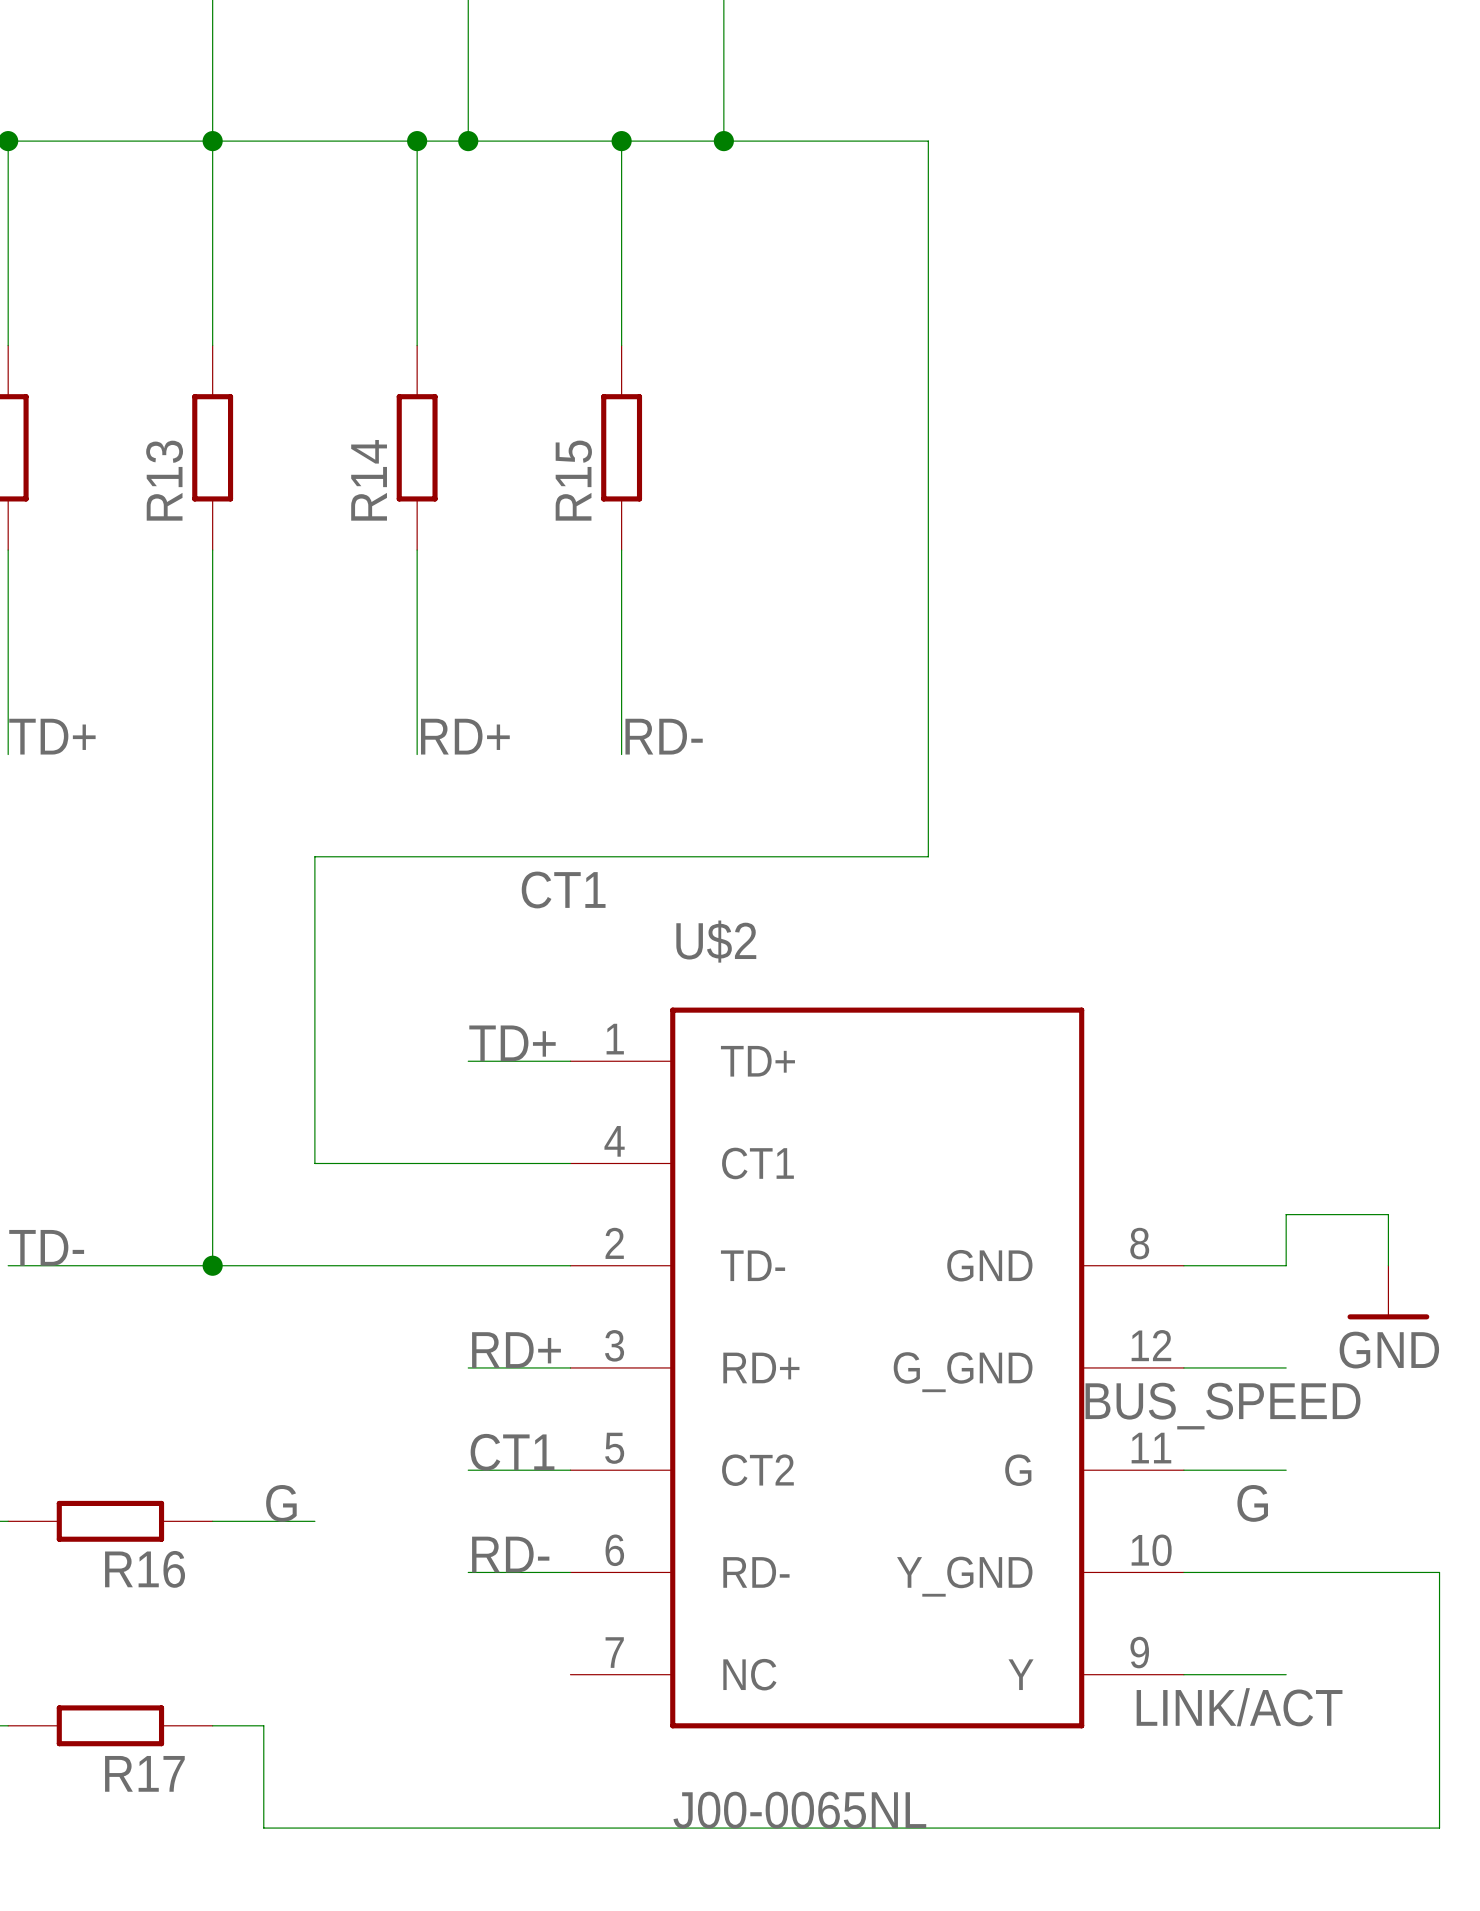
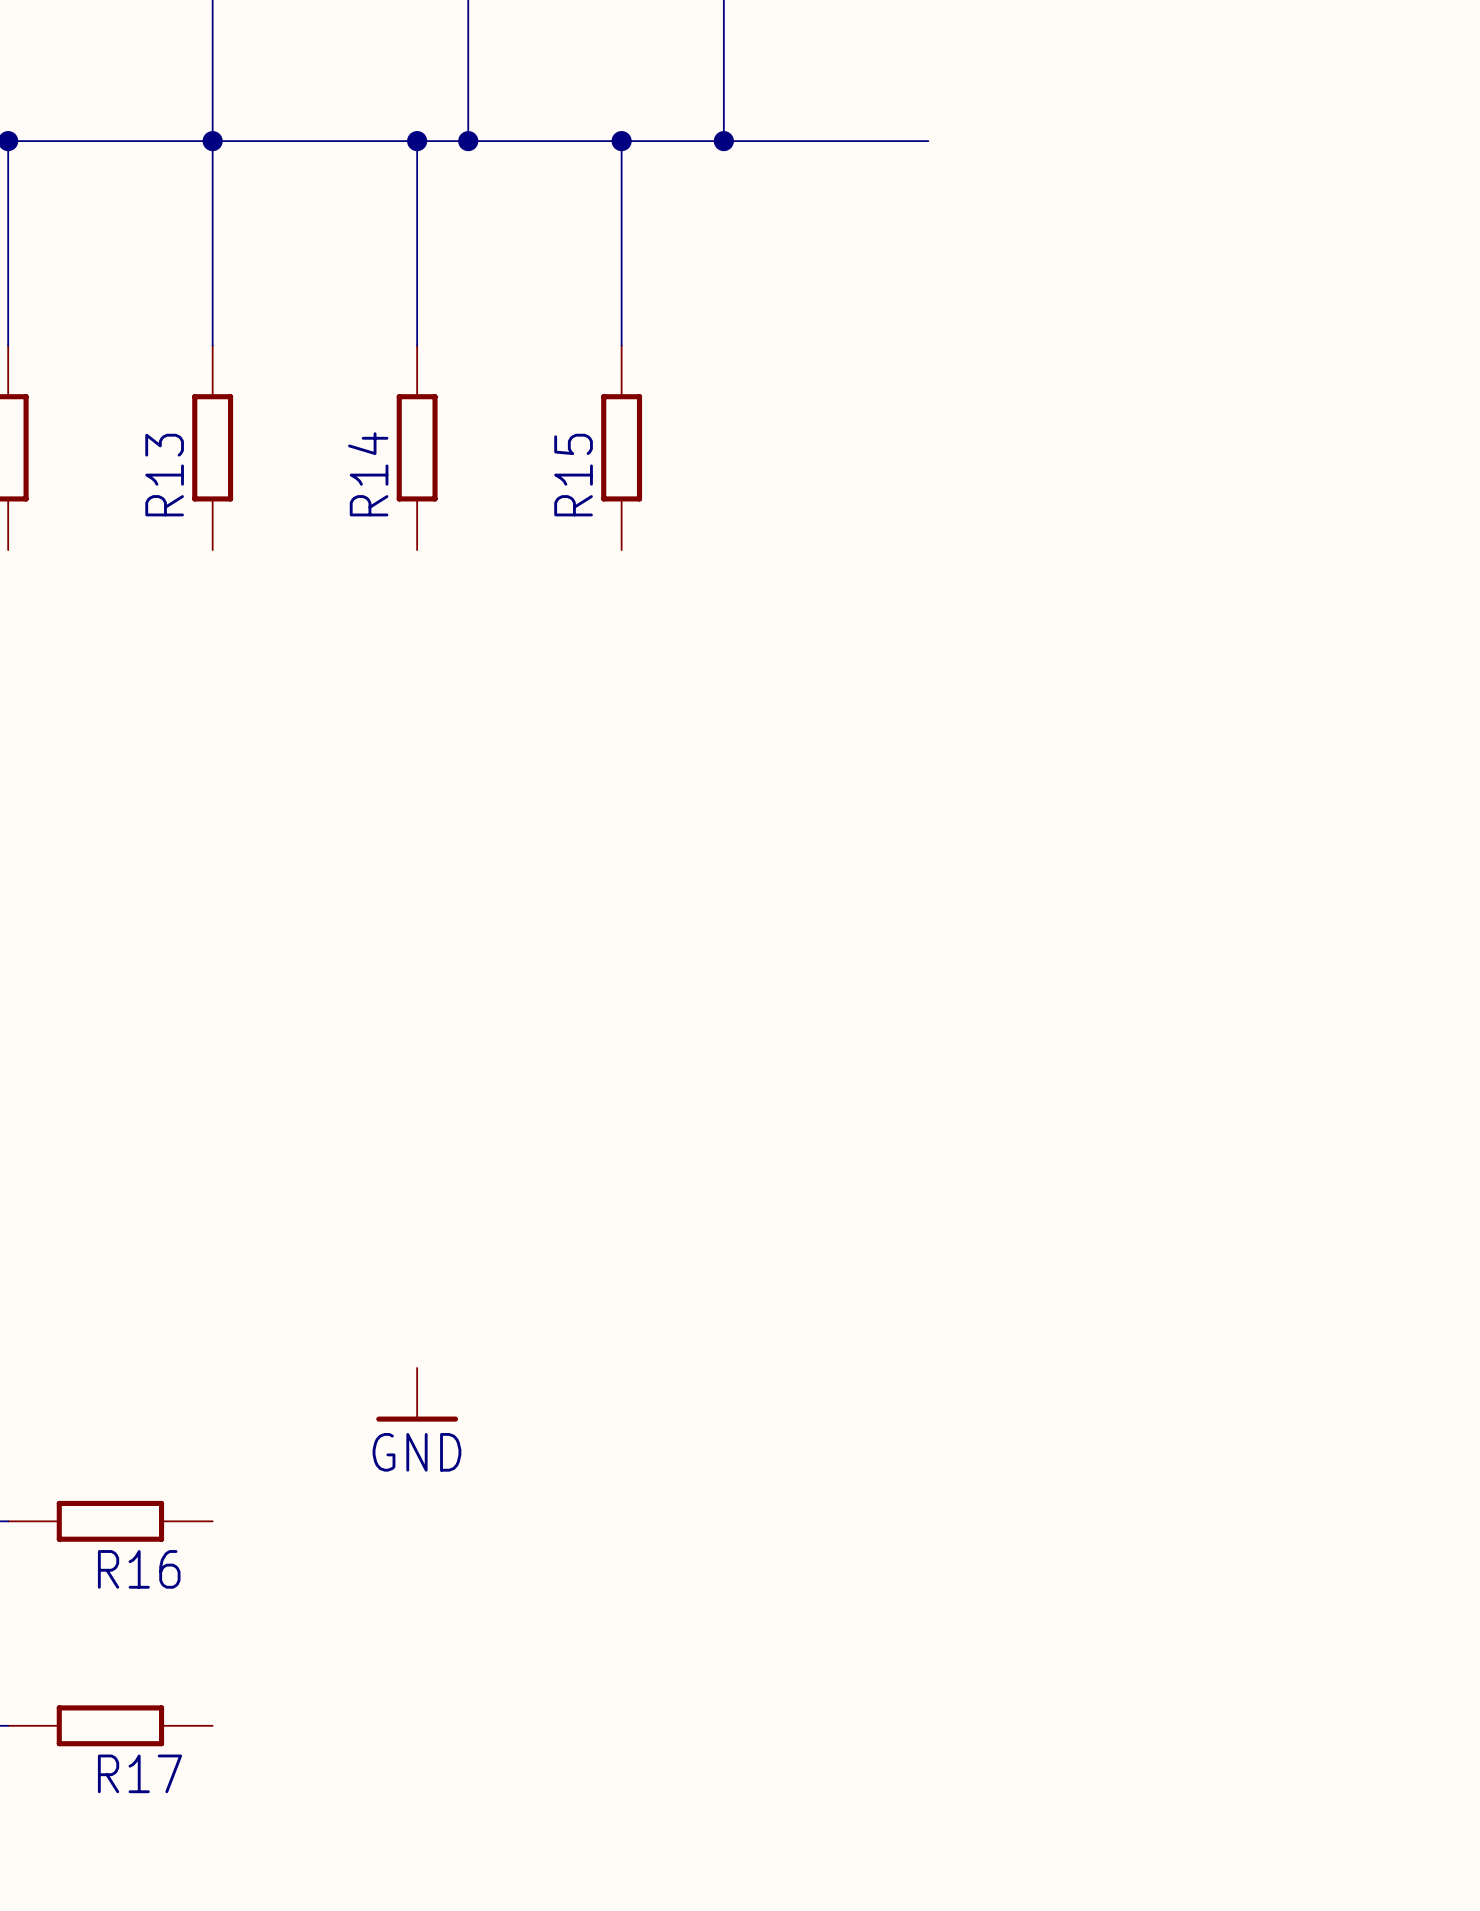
wire: (928, 141) (928, 856) (314, 856) (314, 1163) (570, 1163) -> none
wire: (8, 550) (8, 754) -> none
wire: (212, 550) (212, 1265) -> none
wire: (417, 550) (417, 754) -> none
wire: (621, 550) (621, 754) -> none
label: TD+ (52, 736) -> none
label: RD+ (465, 736) -> none
label: RD- (664, 736) -> none
label: CT1 (563, 889) -> none
label: TD+ (512, 1043) -> none
wire: (468, 1061) (570, 1061) -> none
label: TD- (46, 1247) -> none
wire: (8, 1265) (570, 1265) -> none
junction: (212, 1265) -> none
wire: (1183, 1265) (1286, 1265) (1286, 1214) (1388, 1214) (1388, 1265) -> none
power symbol: GND (1388, 1292) -> none
label: RD+ (516, 1350) -> none
wire: (468, 1367) (570, 1367) -> none
U$2: J00-0065NL (877, 1367) -> none
wire: (1183, 1367) (1286, 1367) -> none
power symbol: none -> GND (417, 1394)
label: BUS_SPEED (1222, 1406) -> none
label: CT1 (512, 1452) -> none
wire: (468, 1470) (570, 1470) -> none
wire: (1183, 1470) (1286, 1470) -> none
label: G (281, 1503) -> none
label: G (1252, 1503) -> none
wire: (212, 1521) (314, 1521) -> none
label: RD- (510, 1554) -> none
wire: (468, 1572) (570, 1572) -> none
wire: (1183, 1572) (1439, 1572) (1439, 1828) (263, 1828) (263, 1725) (212, 1725) -> none
wire: (1183, 1674) (1286, 1674) -> none
label: LINK/ACT (1239, 1707) -> none

